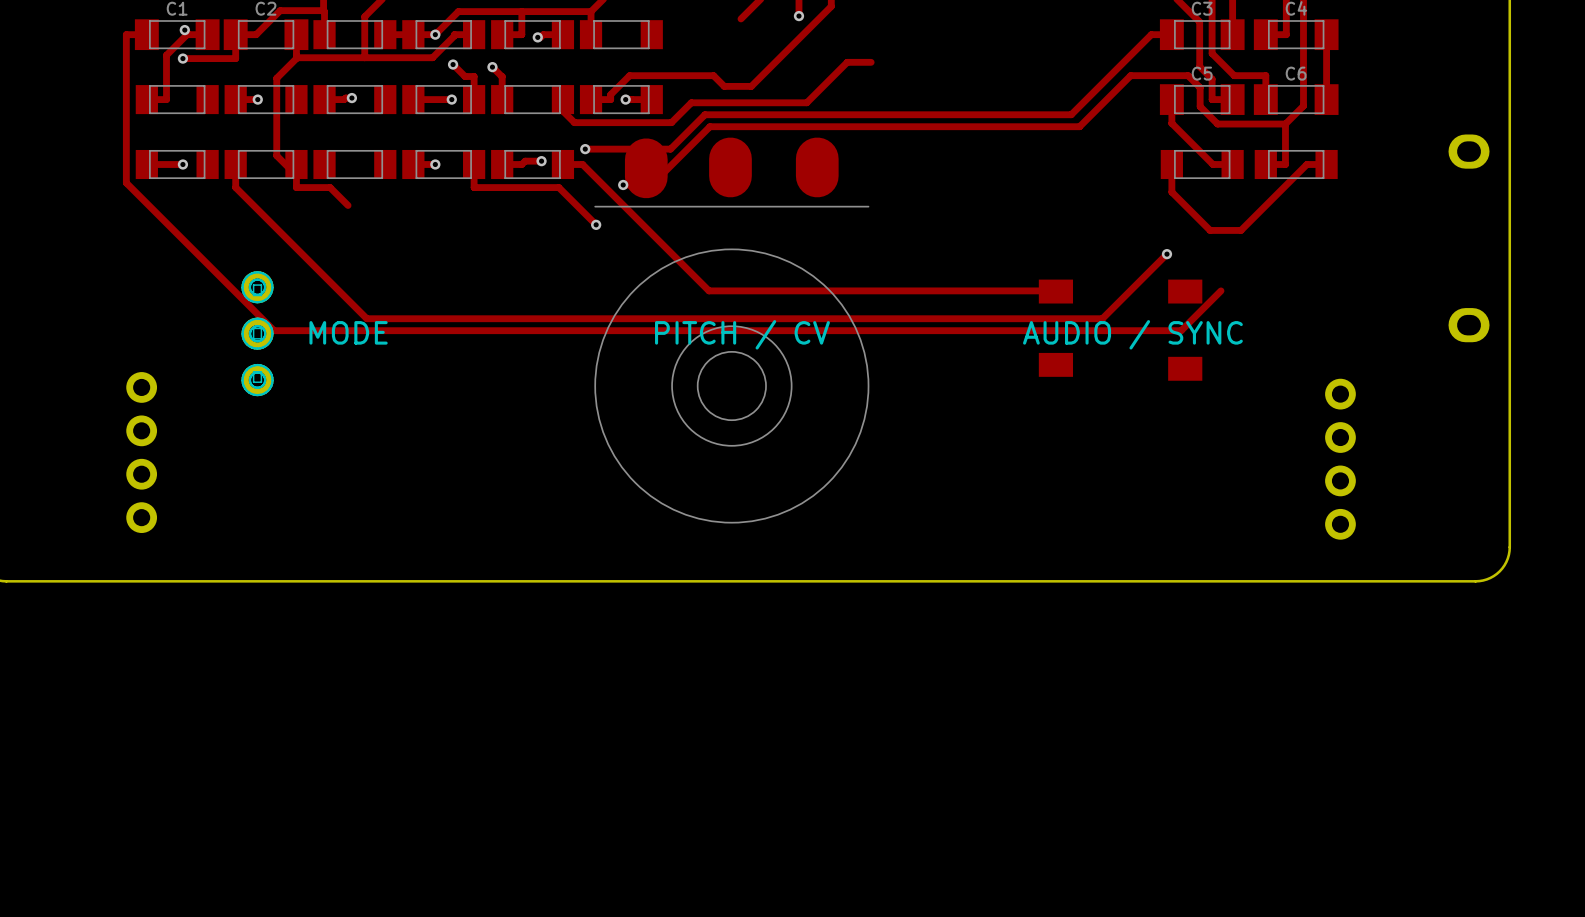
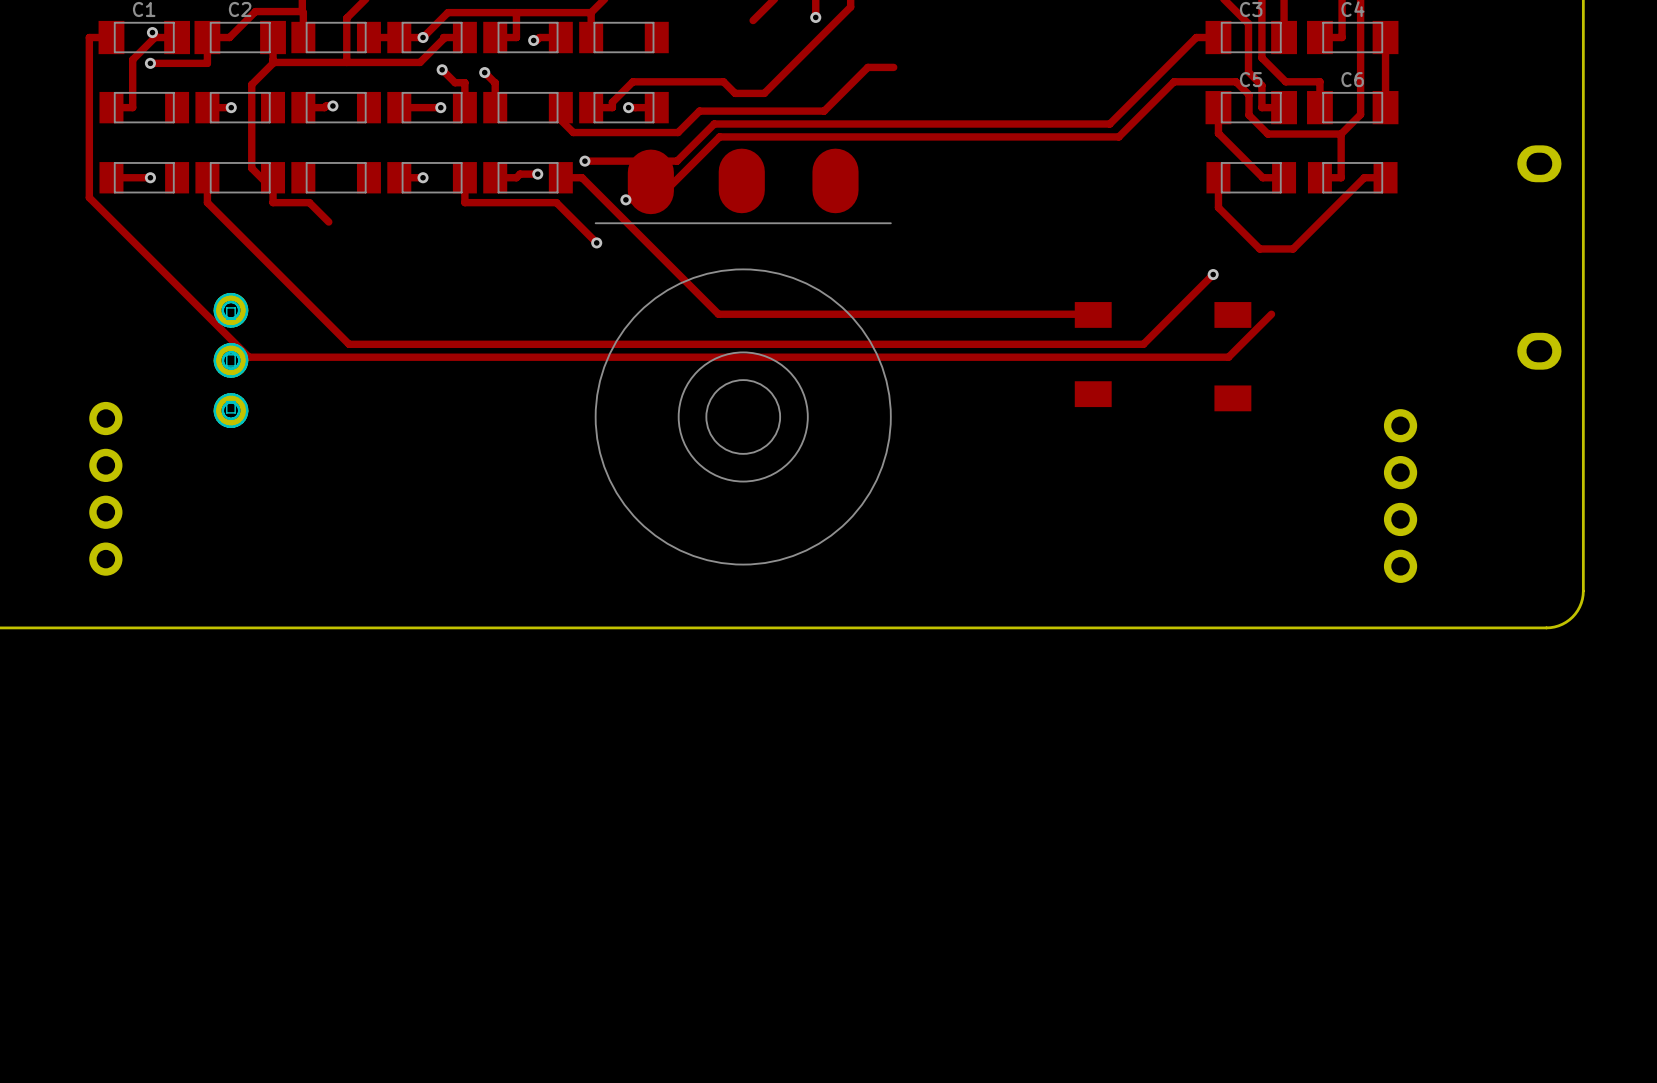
text: MODE (348, 332) -> none
text: PITCH / CV (742, 334) -> none
text: AUDIO / SYNC (1132, 334) -> none

